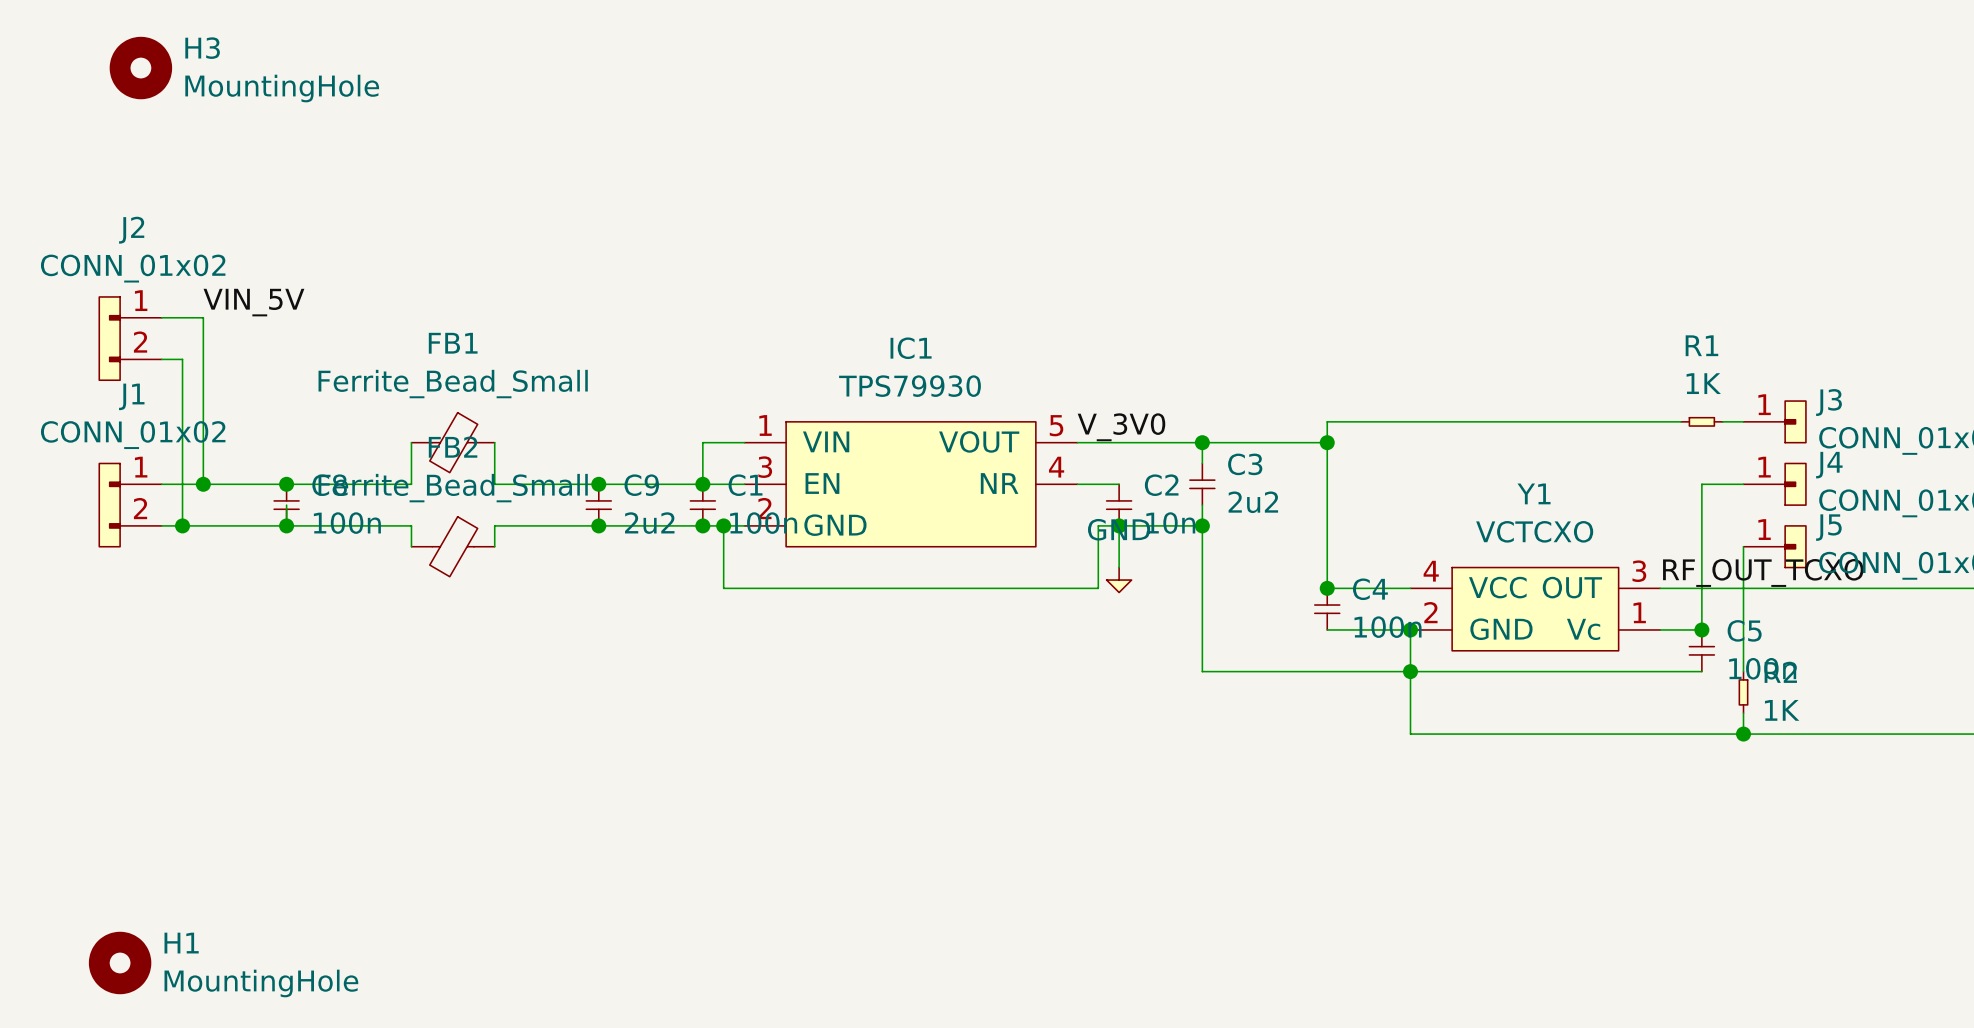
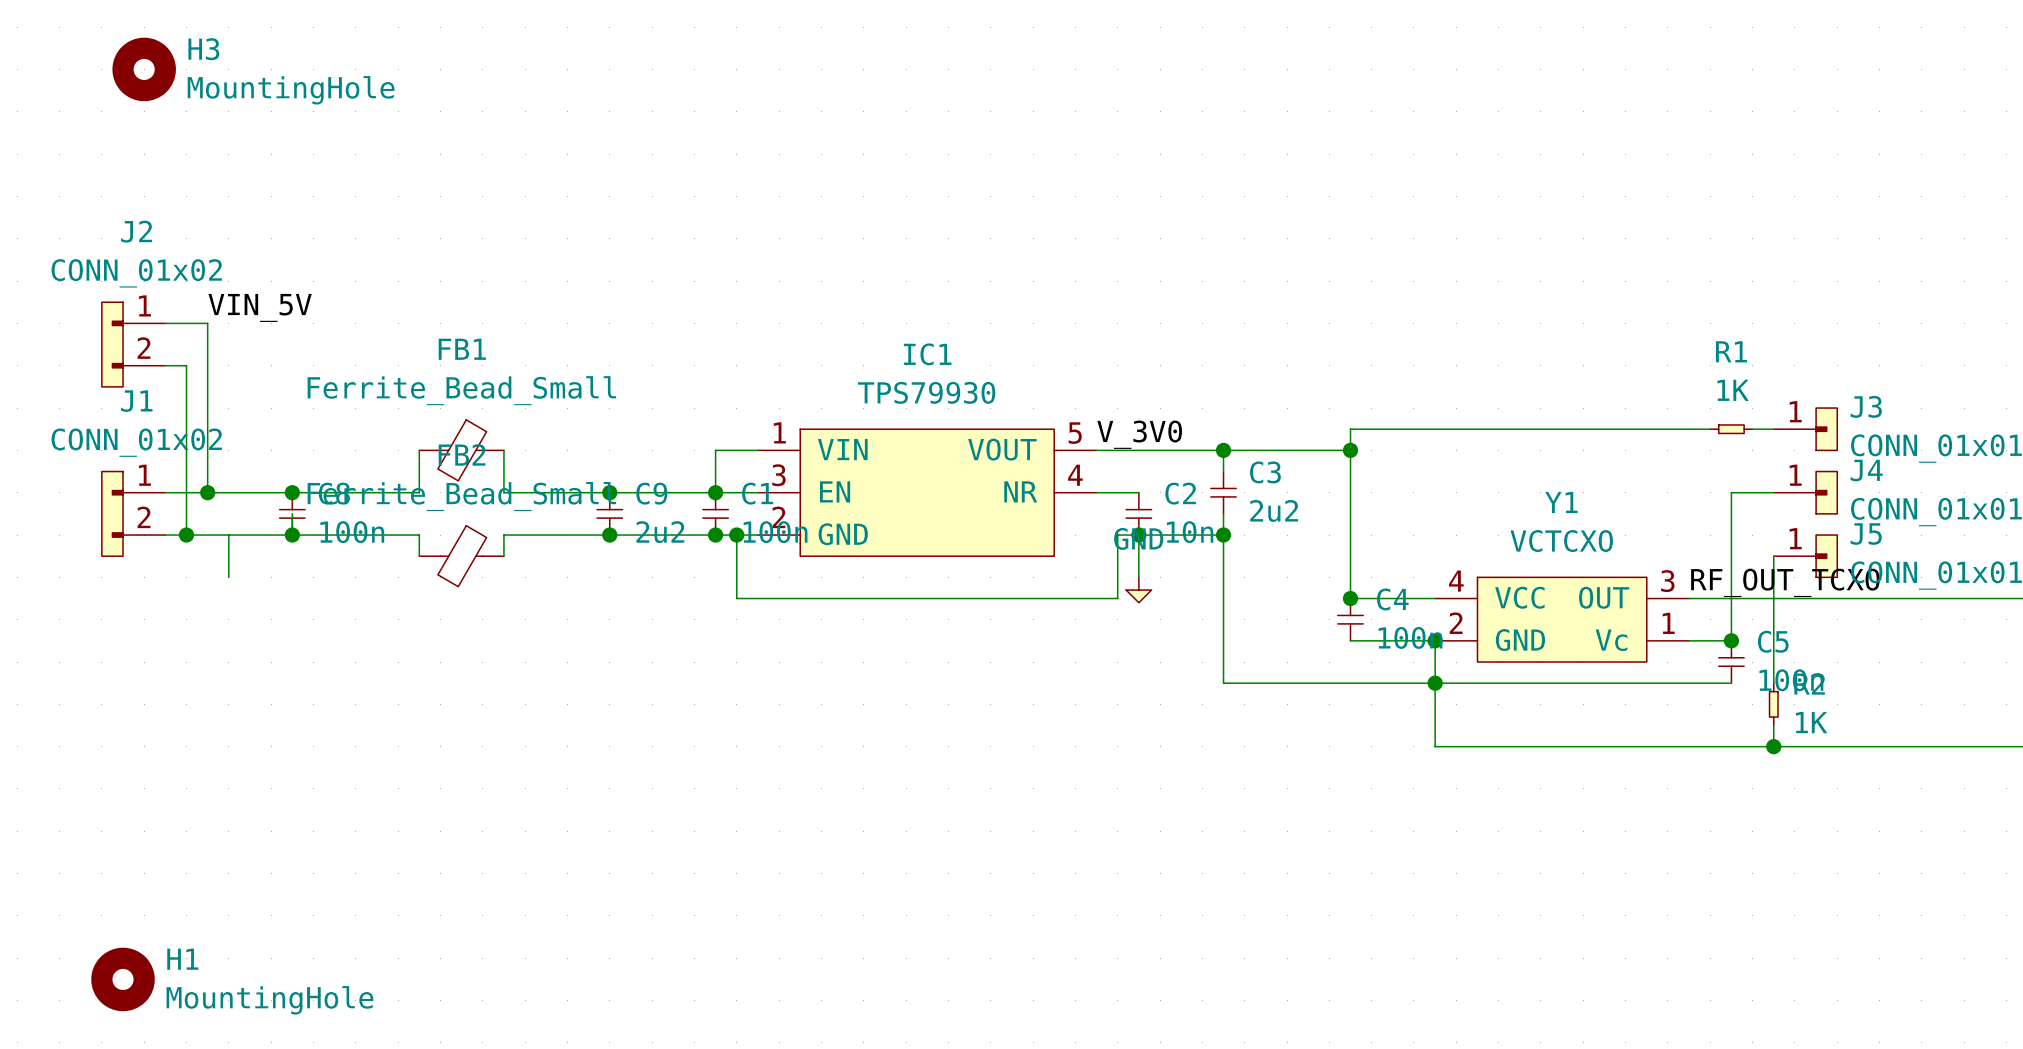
wire: none -> (228, 535) (228, 577)

